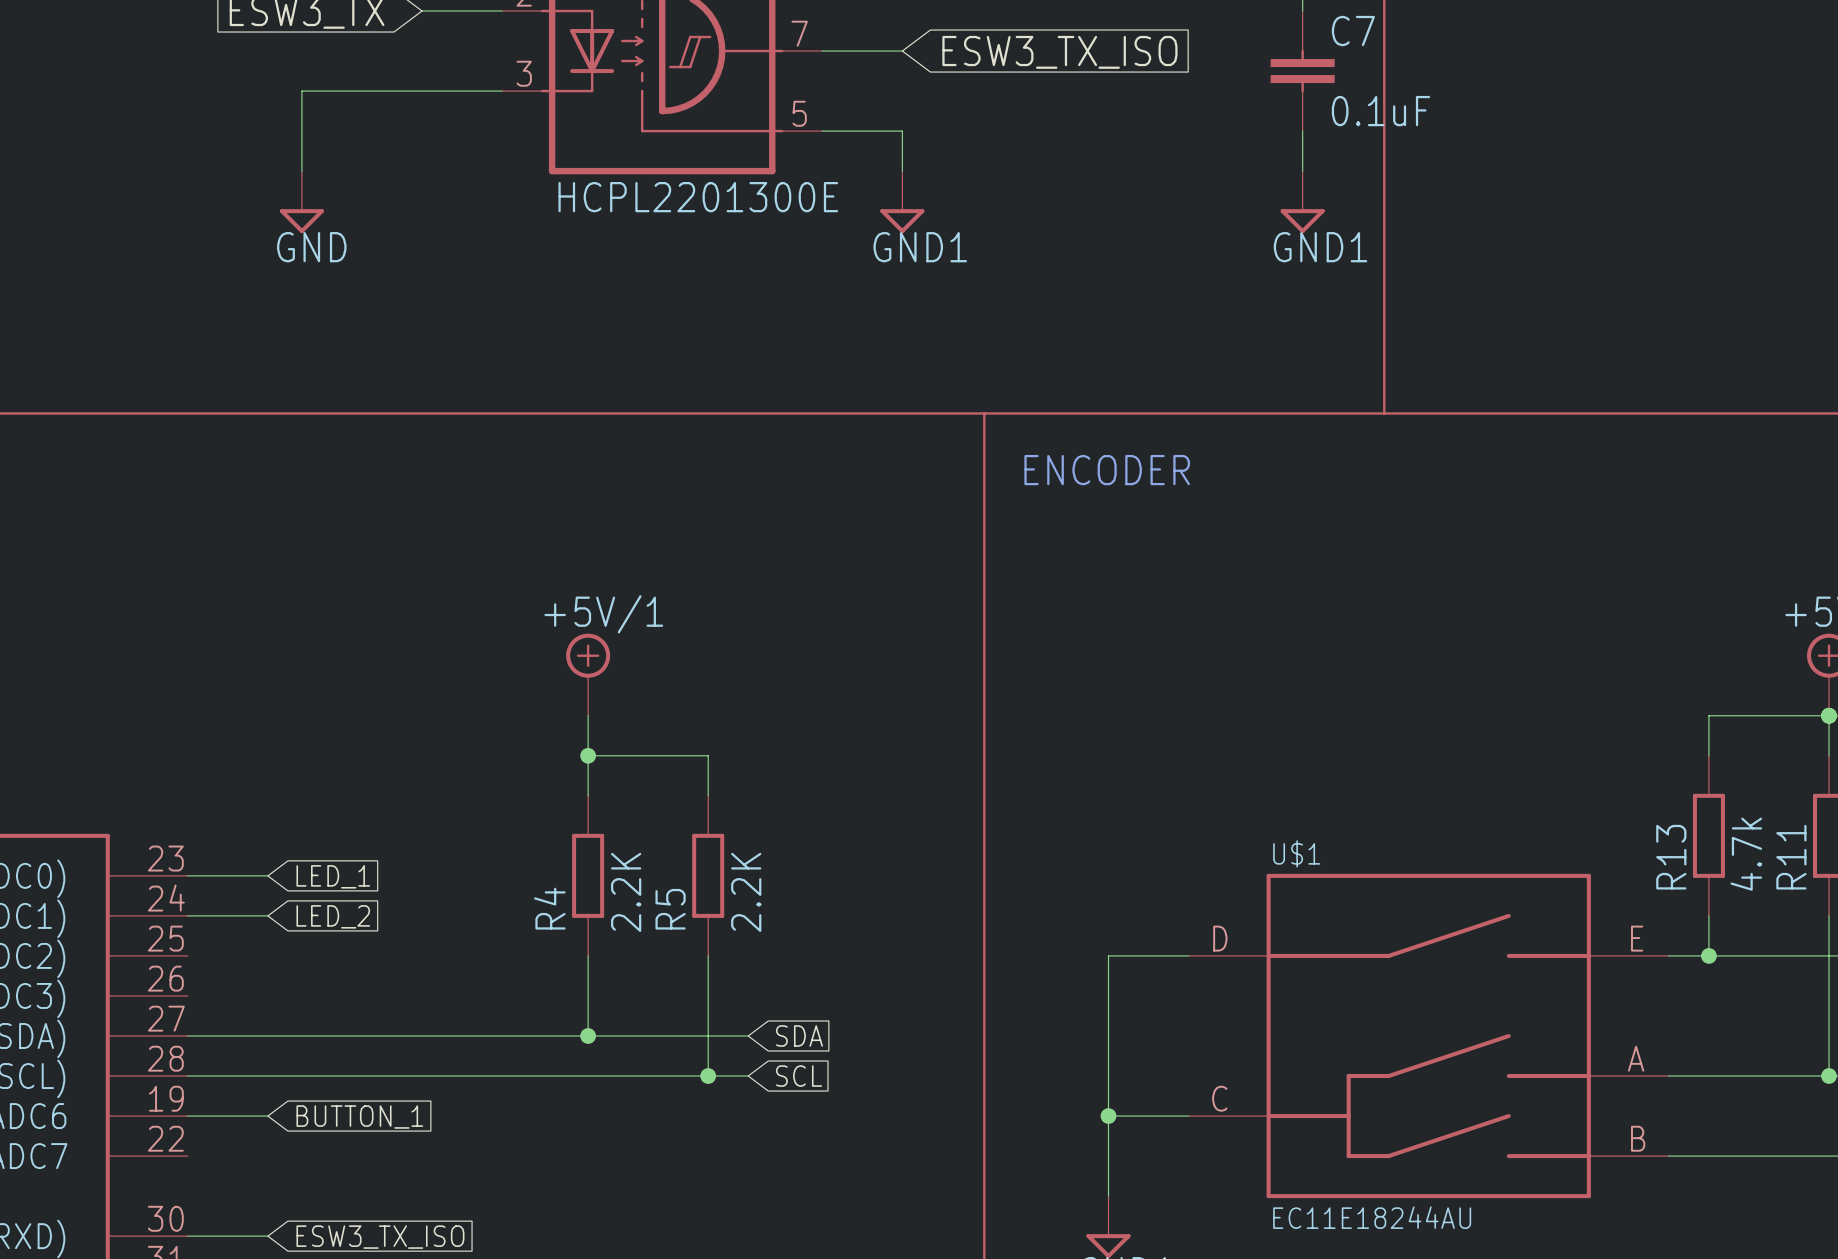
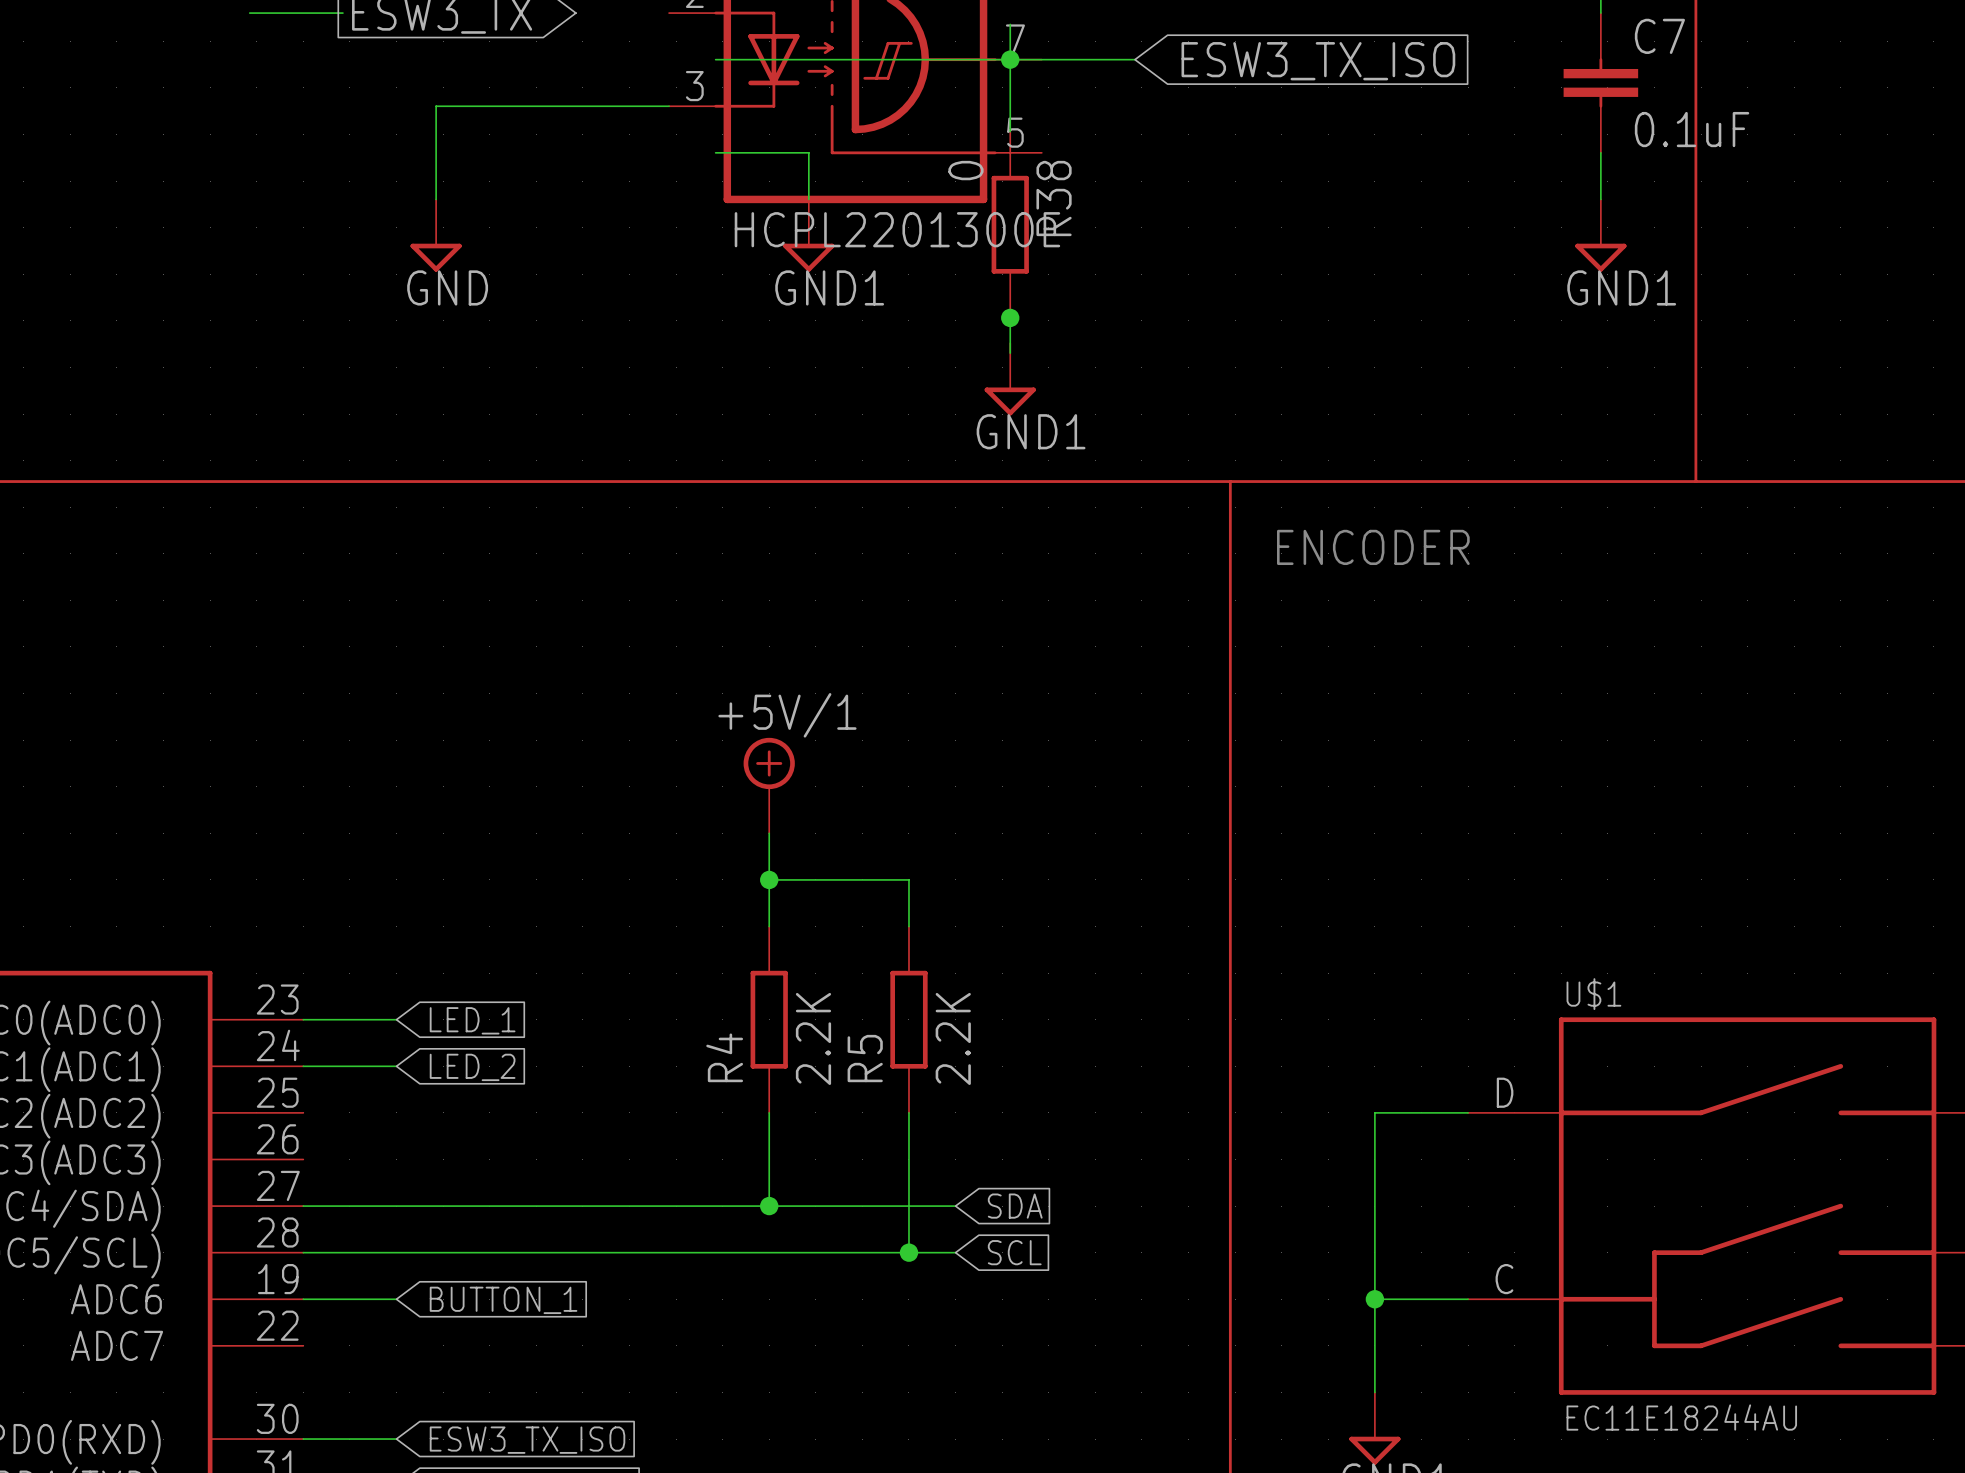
wire: (422, 11) (502, 11) -> (249, 13) (342, 13)
wire: none -> (1010, 24) (1010, 131)
wire: none -> (715, 59) (1041, 59)
junction: none -> (1010, 59)
wire: (822, 131) (902, 131) (902, 171) -> (715, 152) (808, 152) (808, 199)
R38: none -> 0 (1010, 224)
power symbol: none -> GND1 (808, 235)
power symbol: GND1 (902, 202) -> none
wire: none -> (1010, 316) (1010, 353)
junction: none -> (1010, 317)
power symbol: none -> GND1 (1010, 379)

